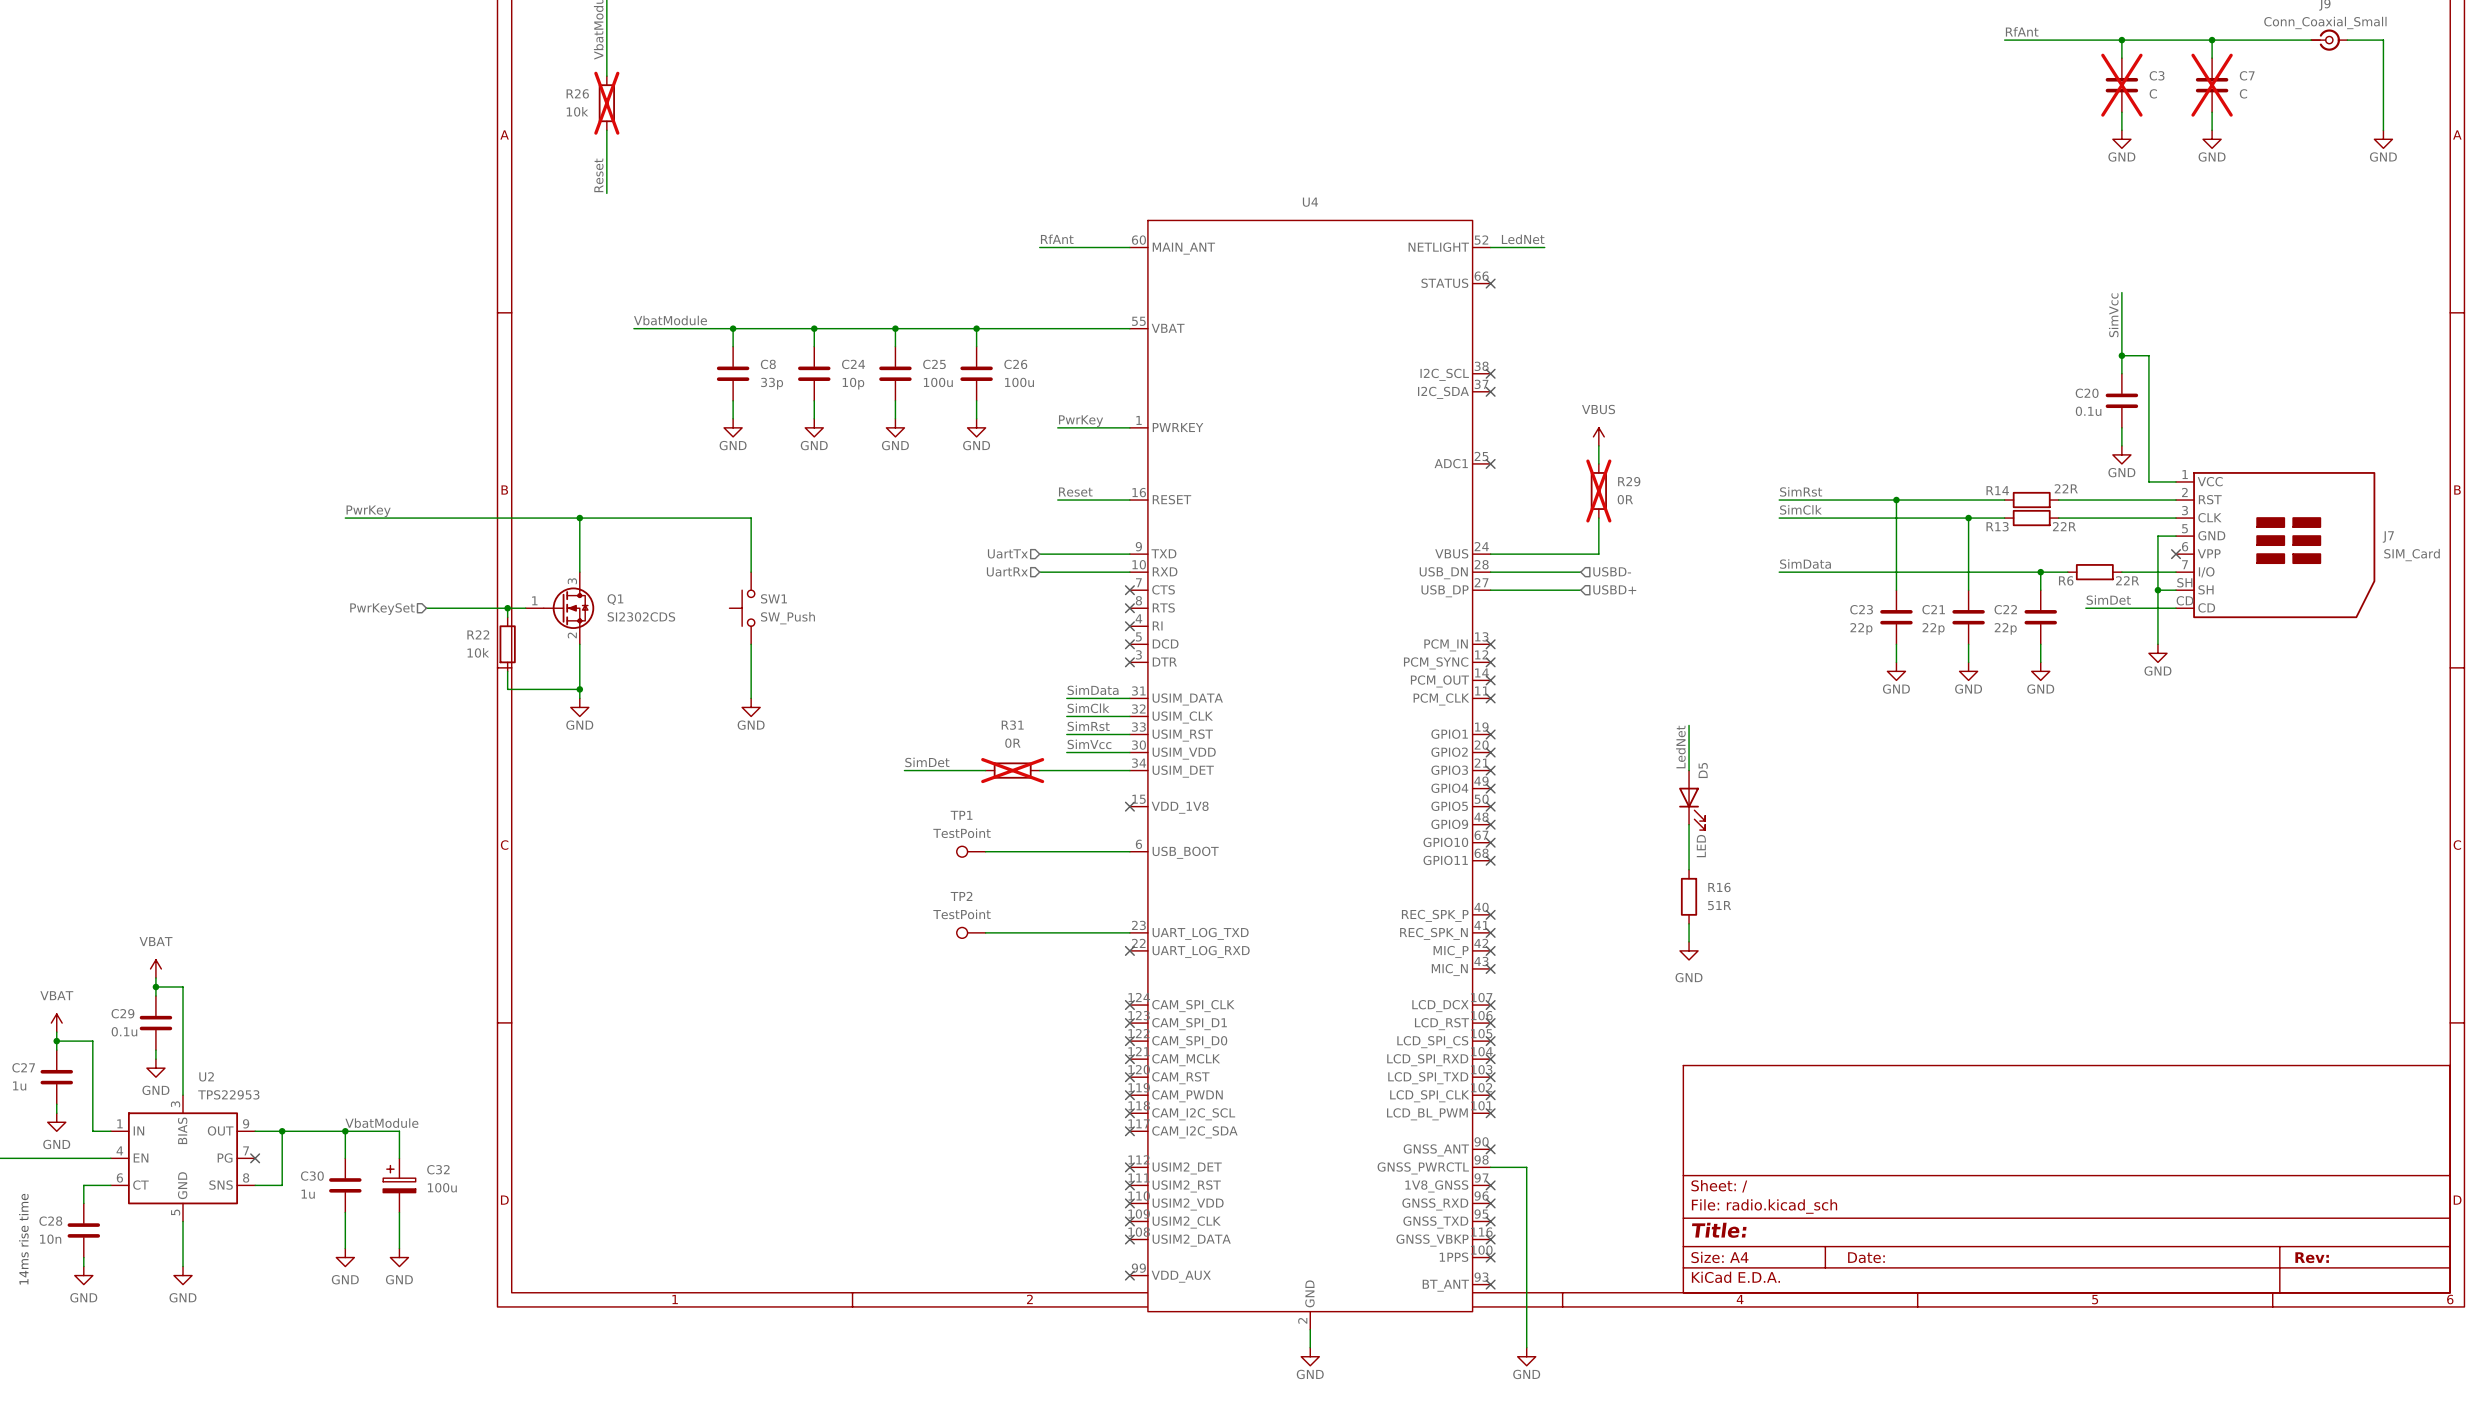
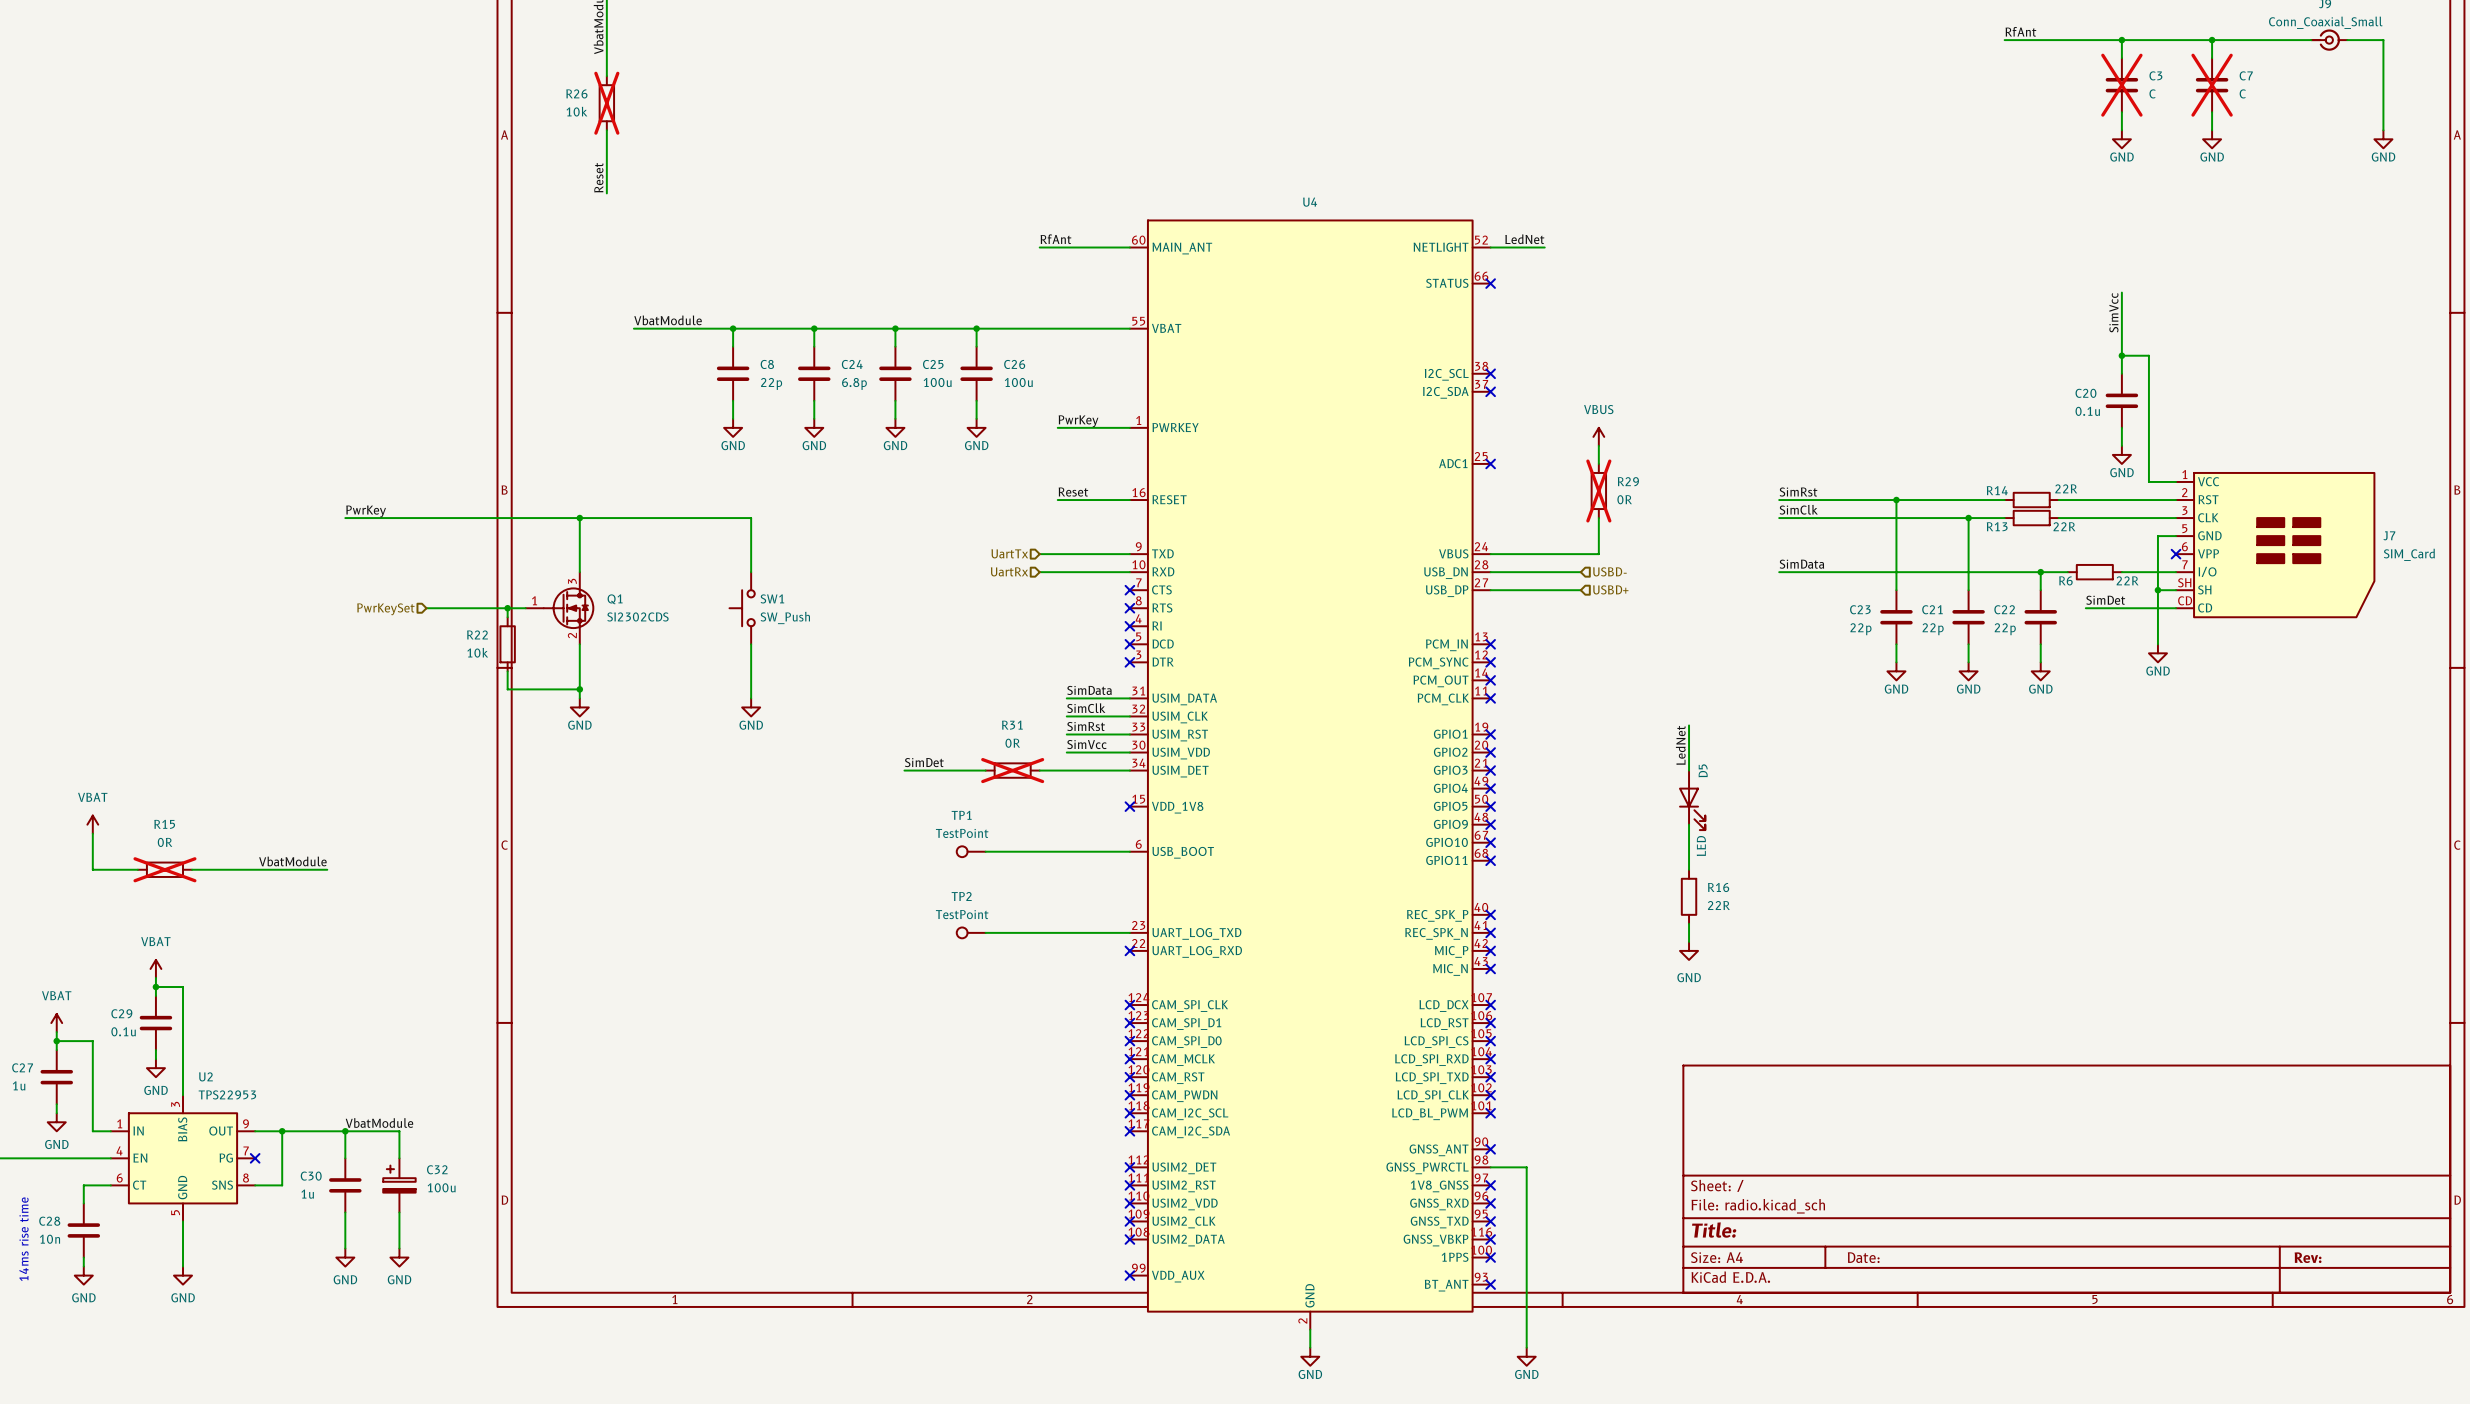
C8 value: 33p (772, 383) -> 22p (771, 383)
C24 value: 10p (853, 383) -> 6.8p (854, 383)
power symbol: none -> VBAT (92, 824)
wire: none -> (92, 833) (92, 869) (137, 869)
label: none -> VbatModule (292, 861)
R15: none -> 0R (164, 869)
wire: none -> (192, 869) (327, 869)
R16 value: 51R (1719, 905) -> 22R (1718, 905)

